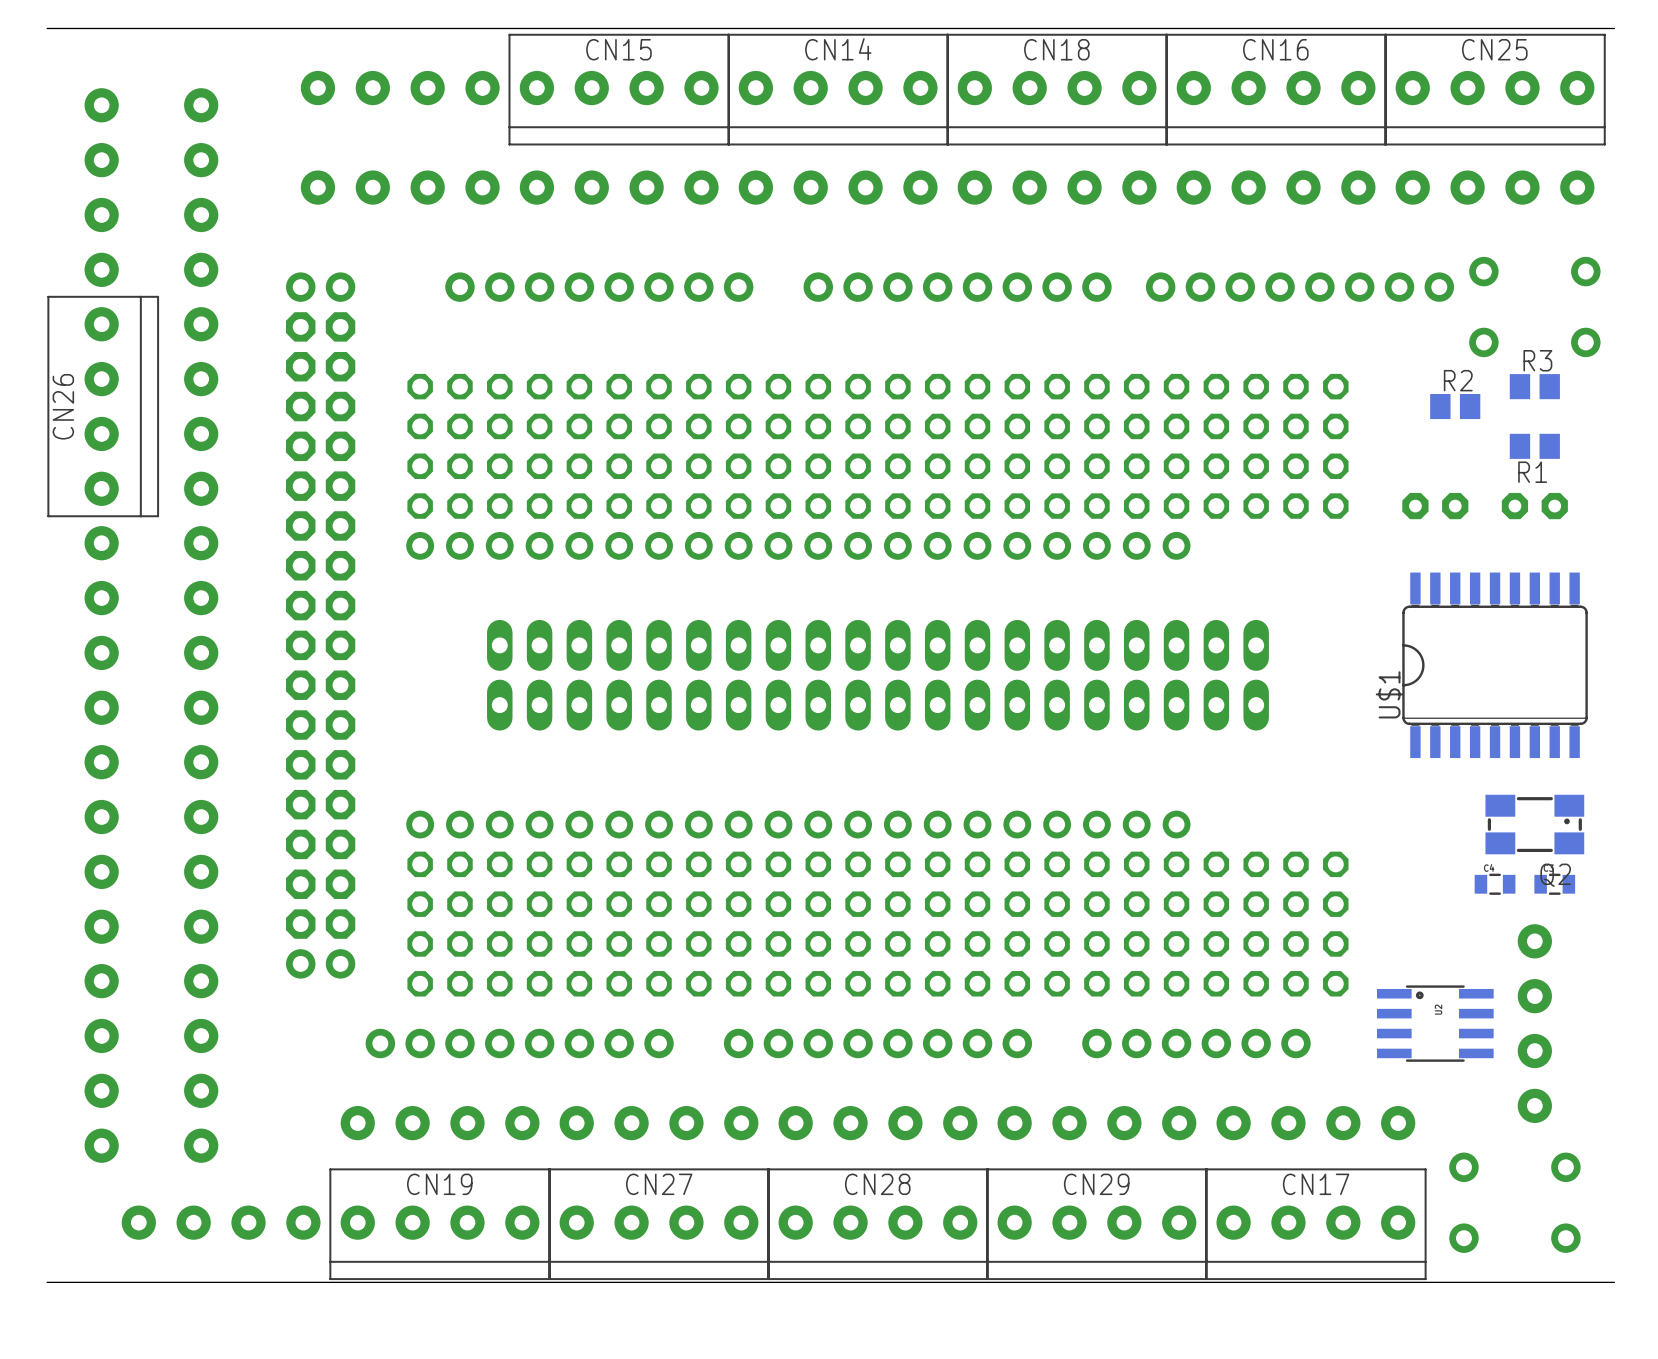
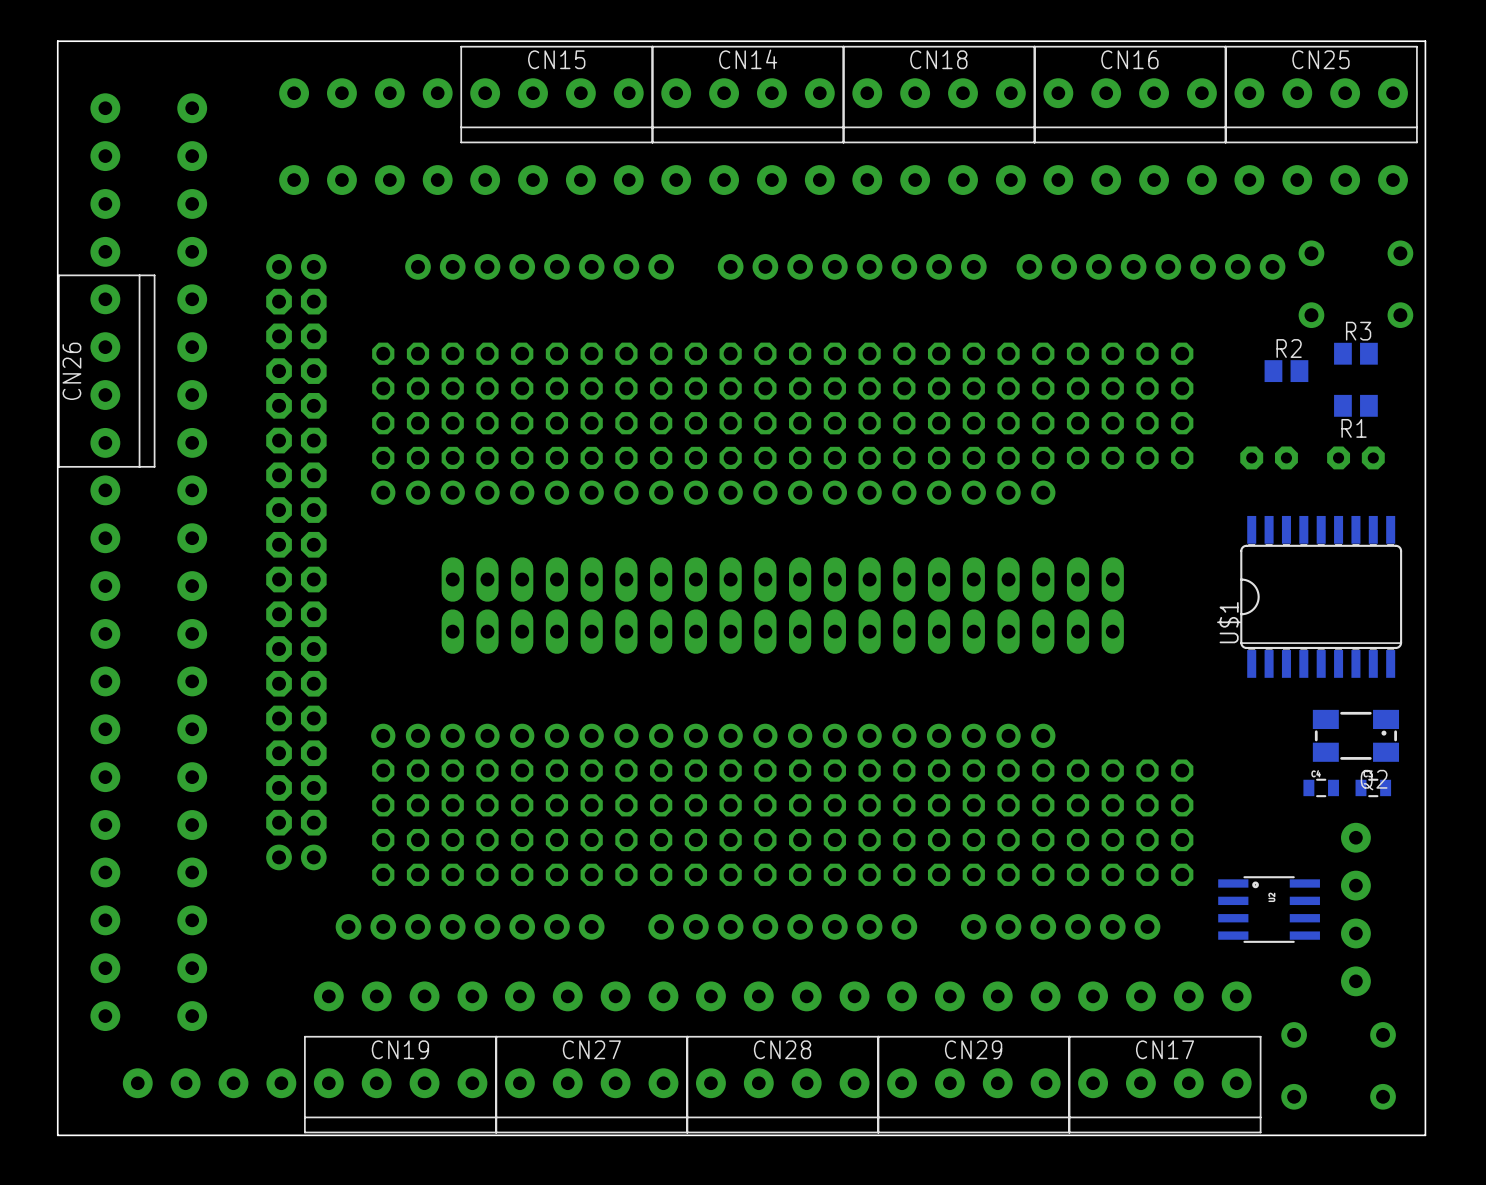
board edge: none -> (57, 41) (57, 1135)
board edge: none -> (1425, 41) (1425, 1135)

